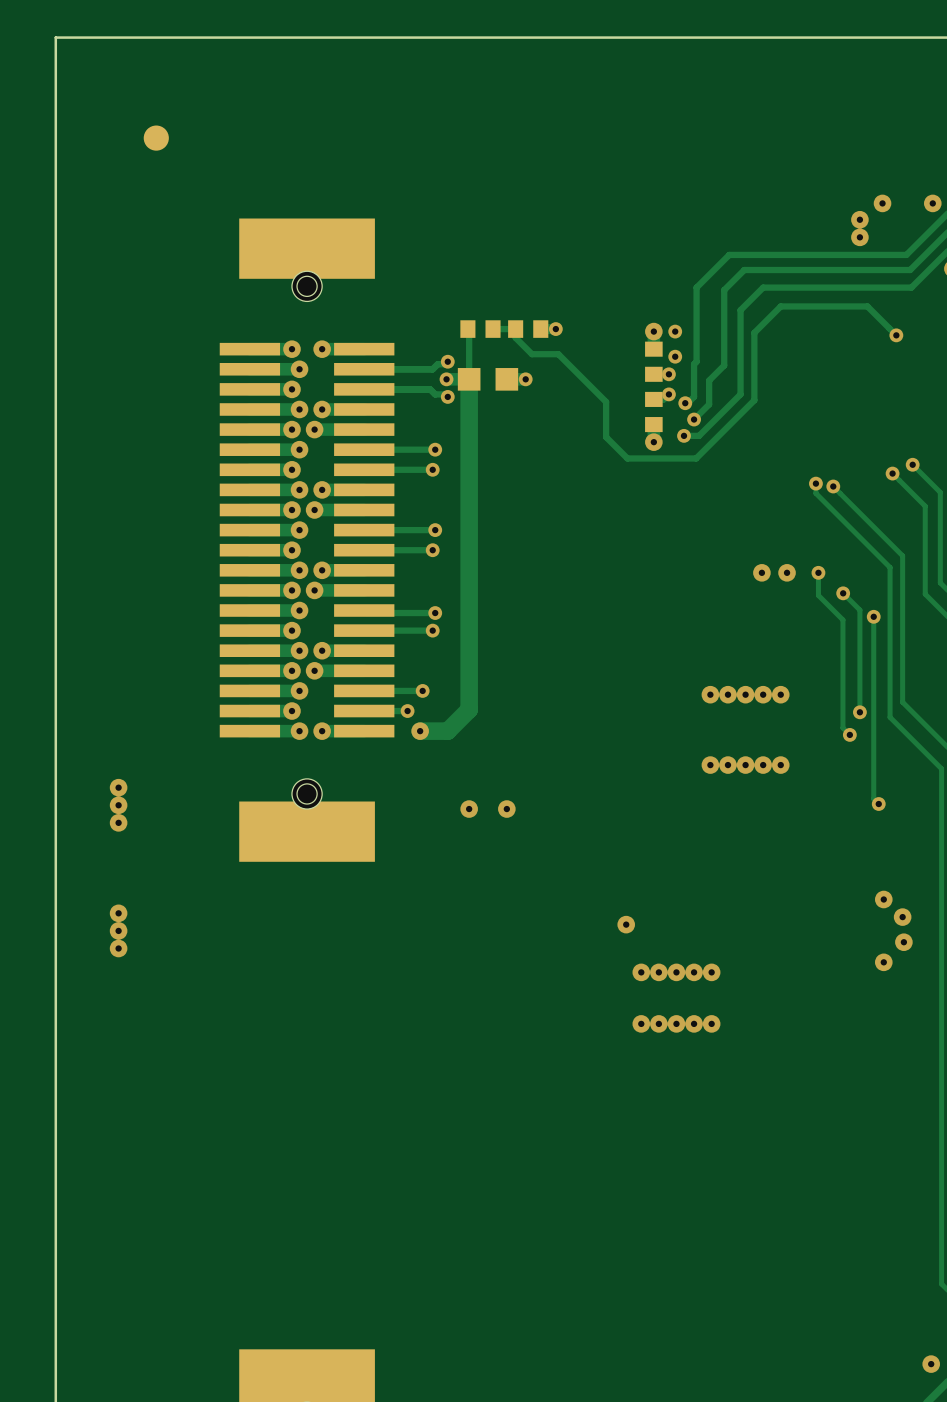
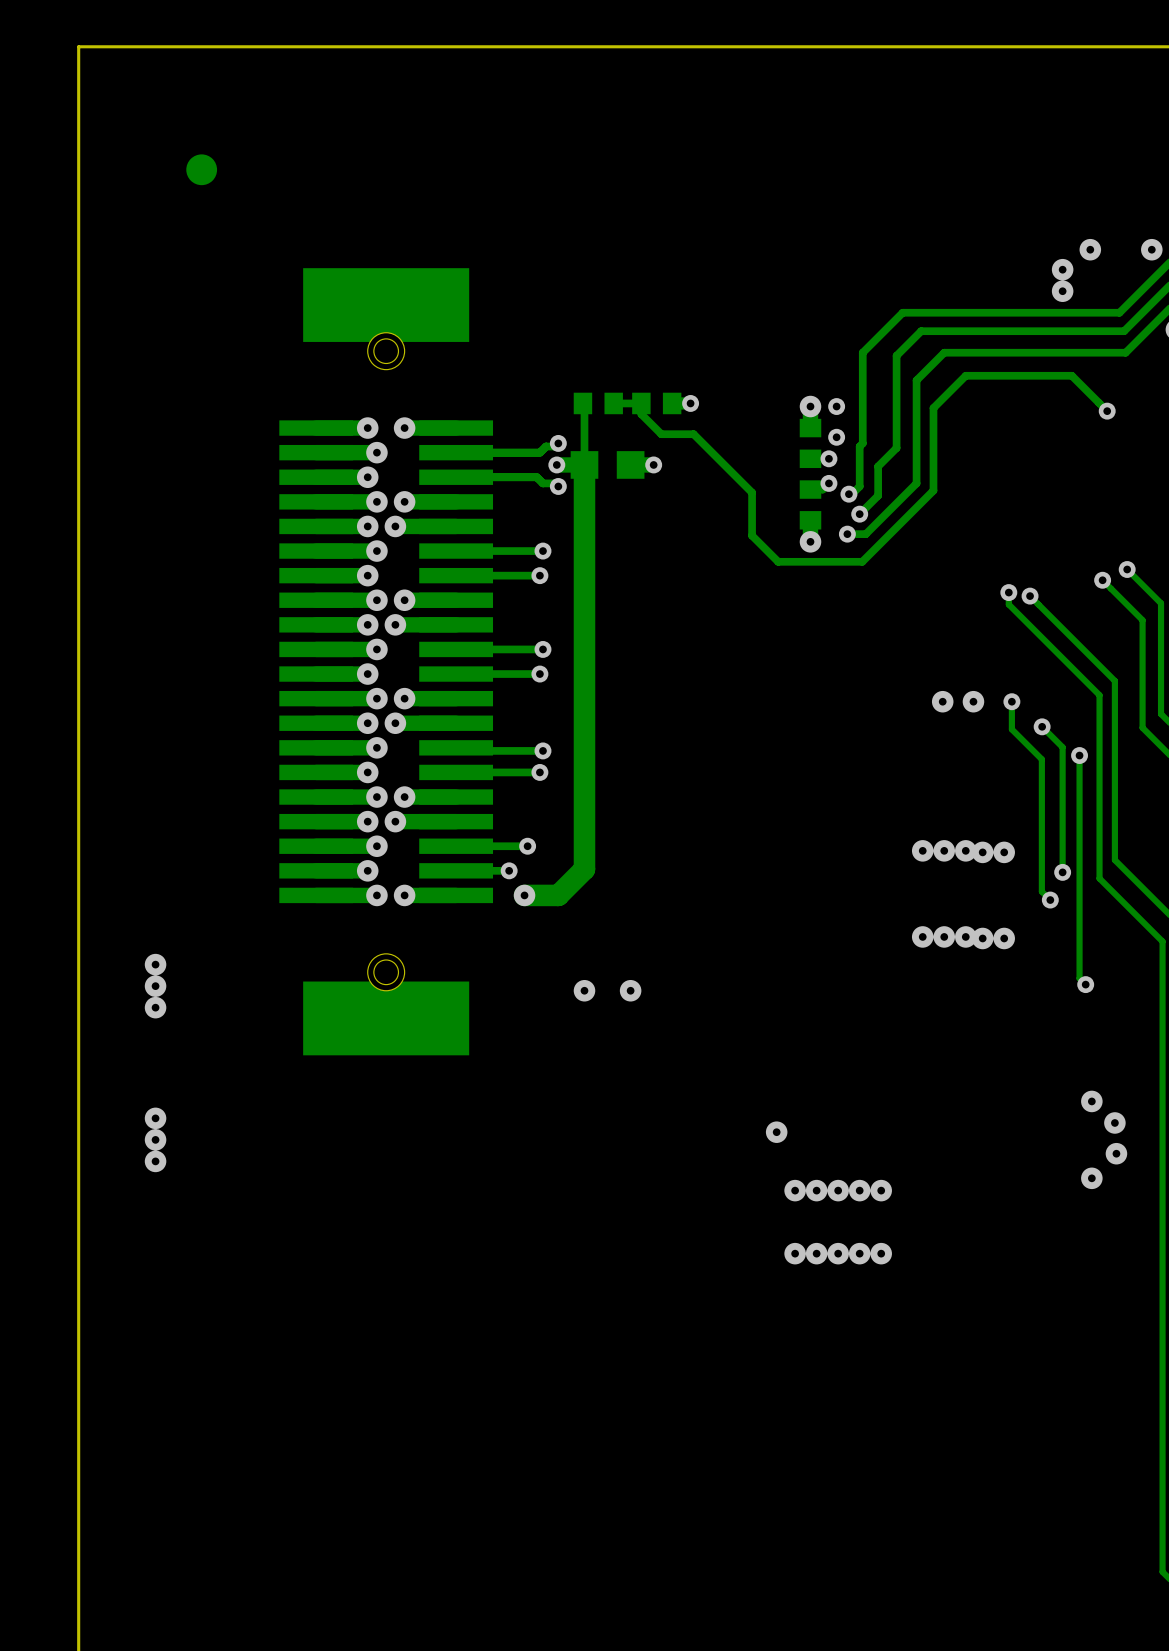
via: (710, 694) -> none
via: (727, 694) -> none
via: none -> (982, 852)
via: none -> (1004, 852)
via: (710, 765) -> none
via: (727, 765) -> none
via: none -> (982, 938)
via: none -> (1004, 938)

